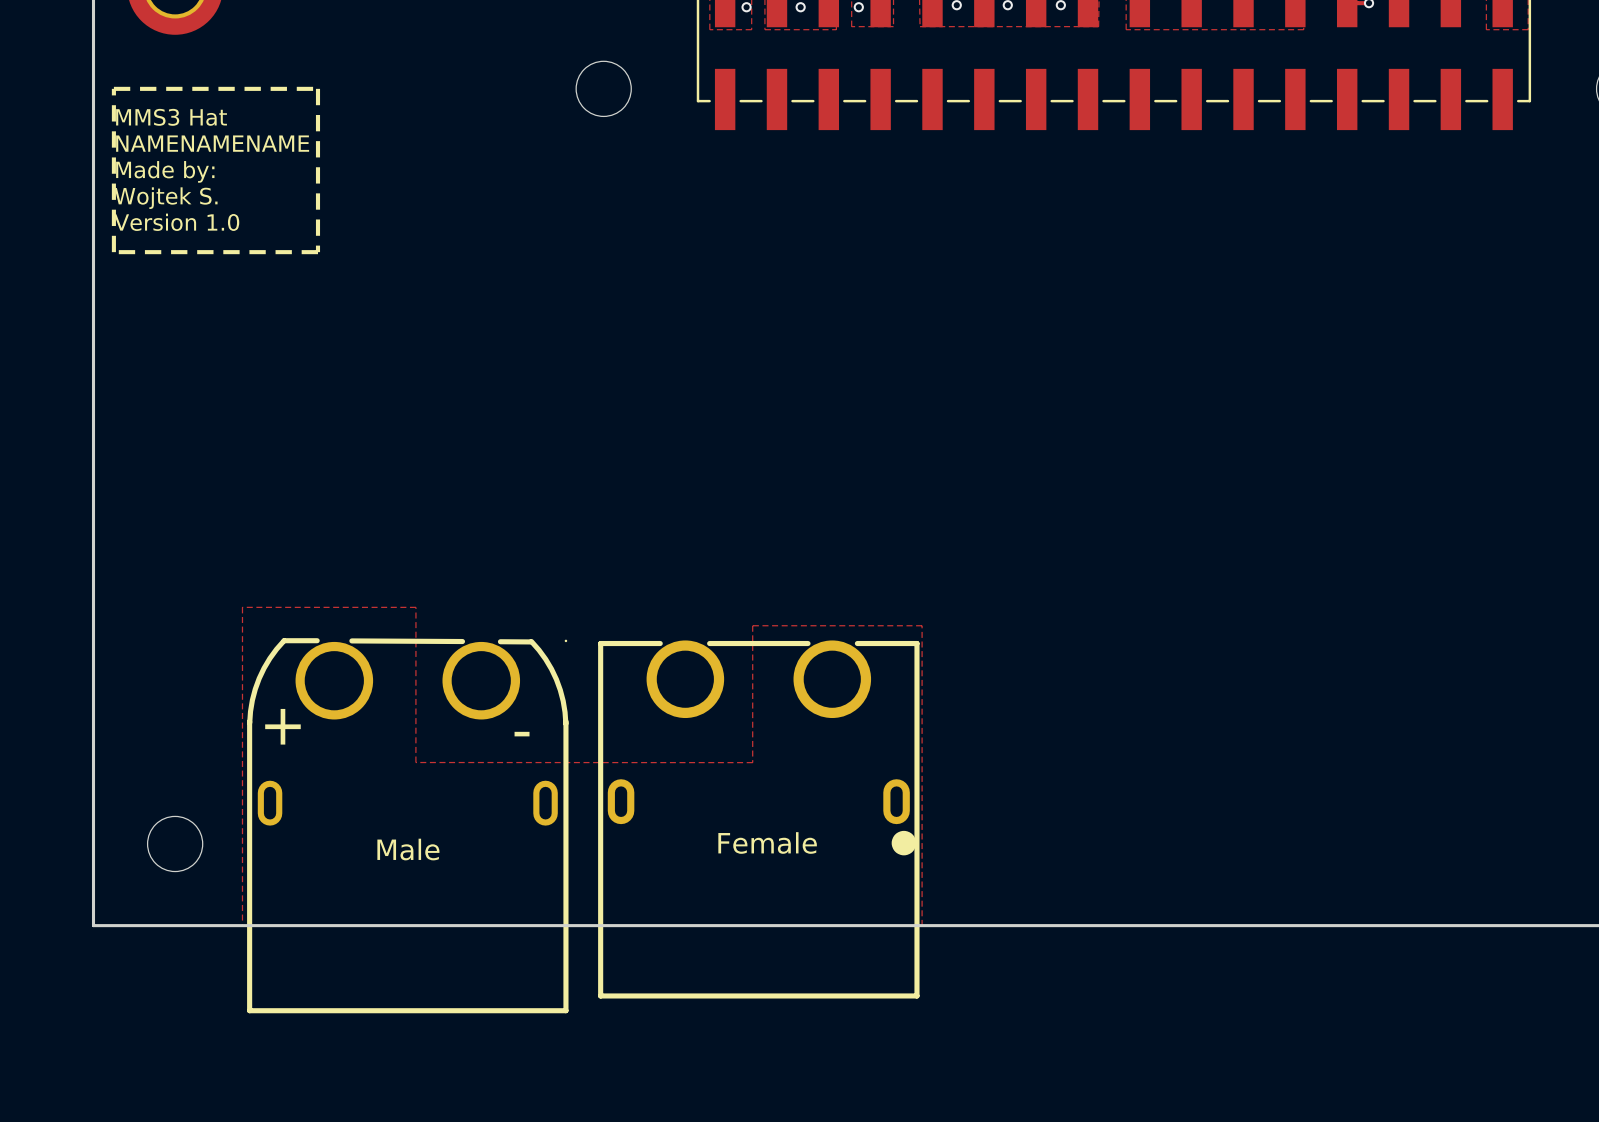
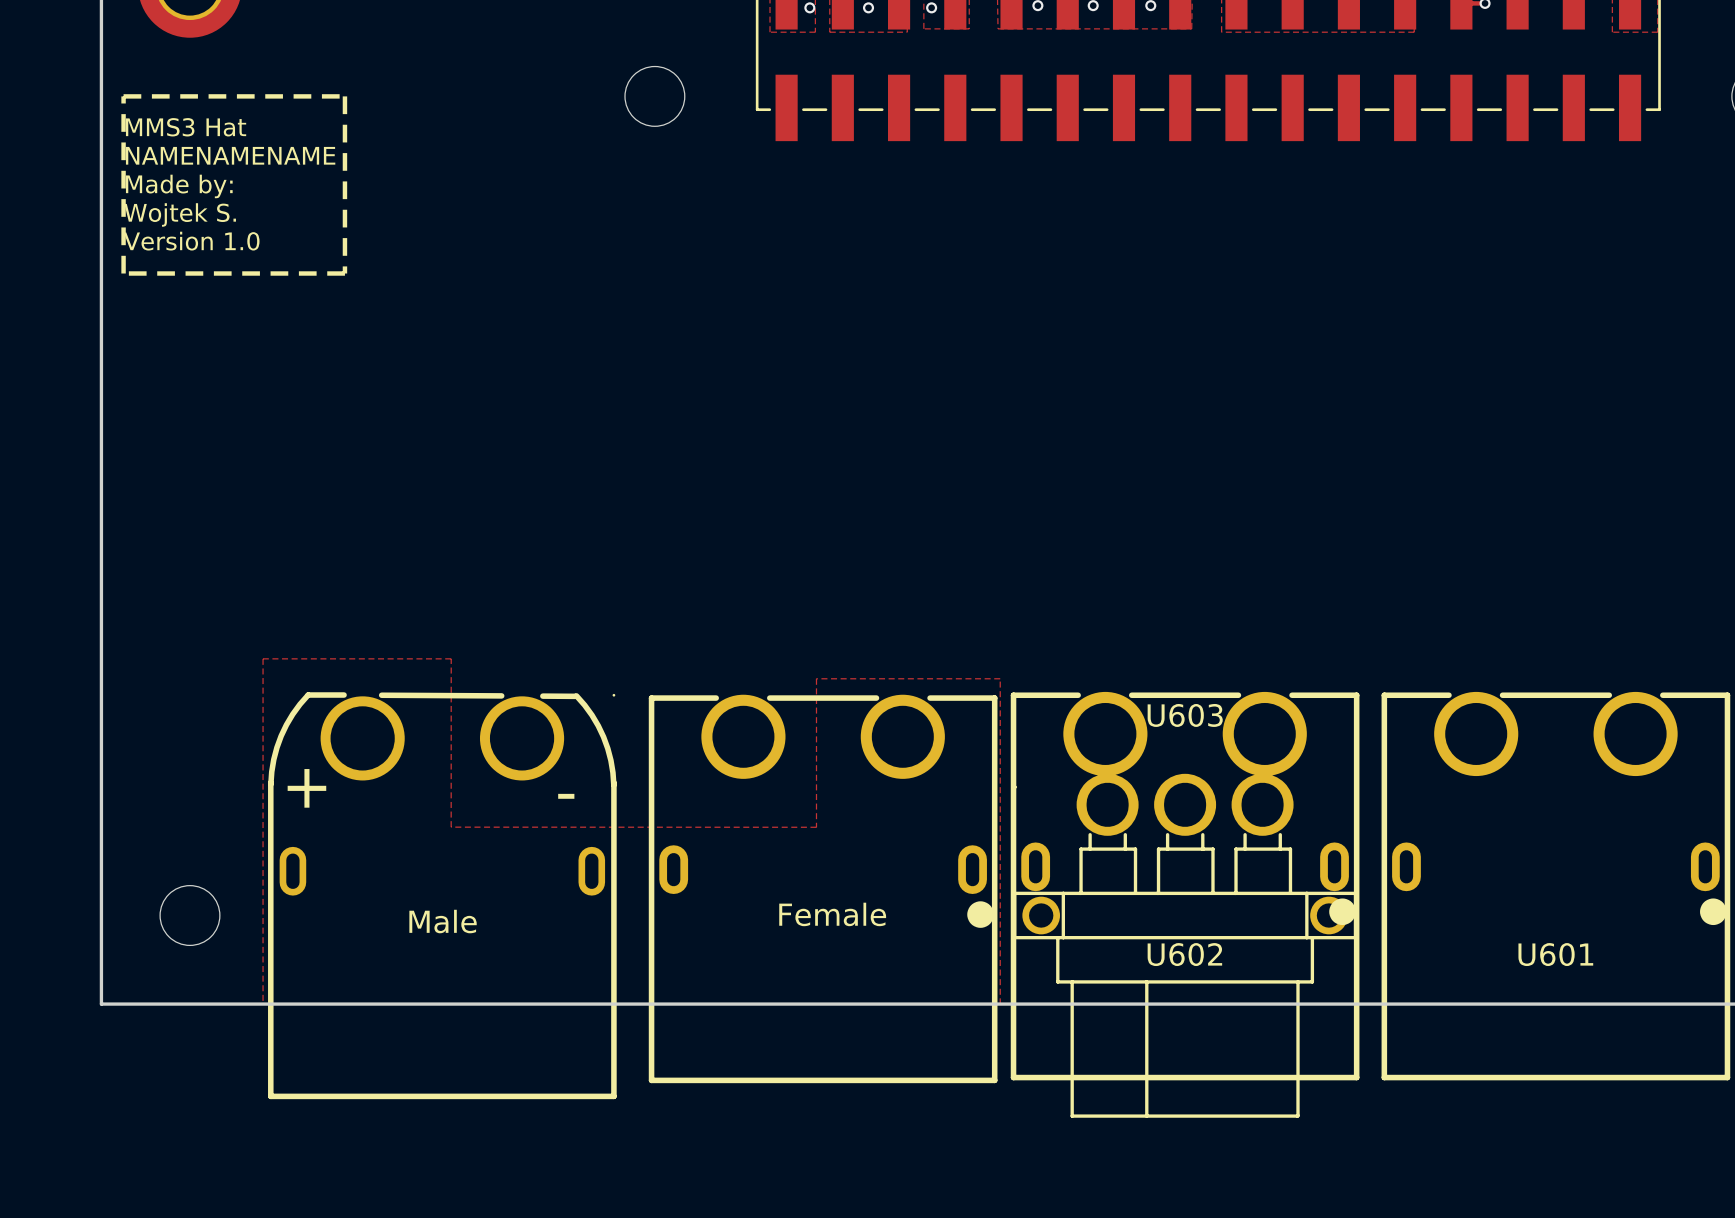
U602: none -> (1185, 886)
U601: none -> (1555, 886)
U603: none -> (1185, 945)

